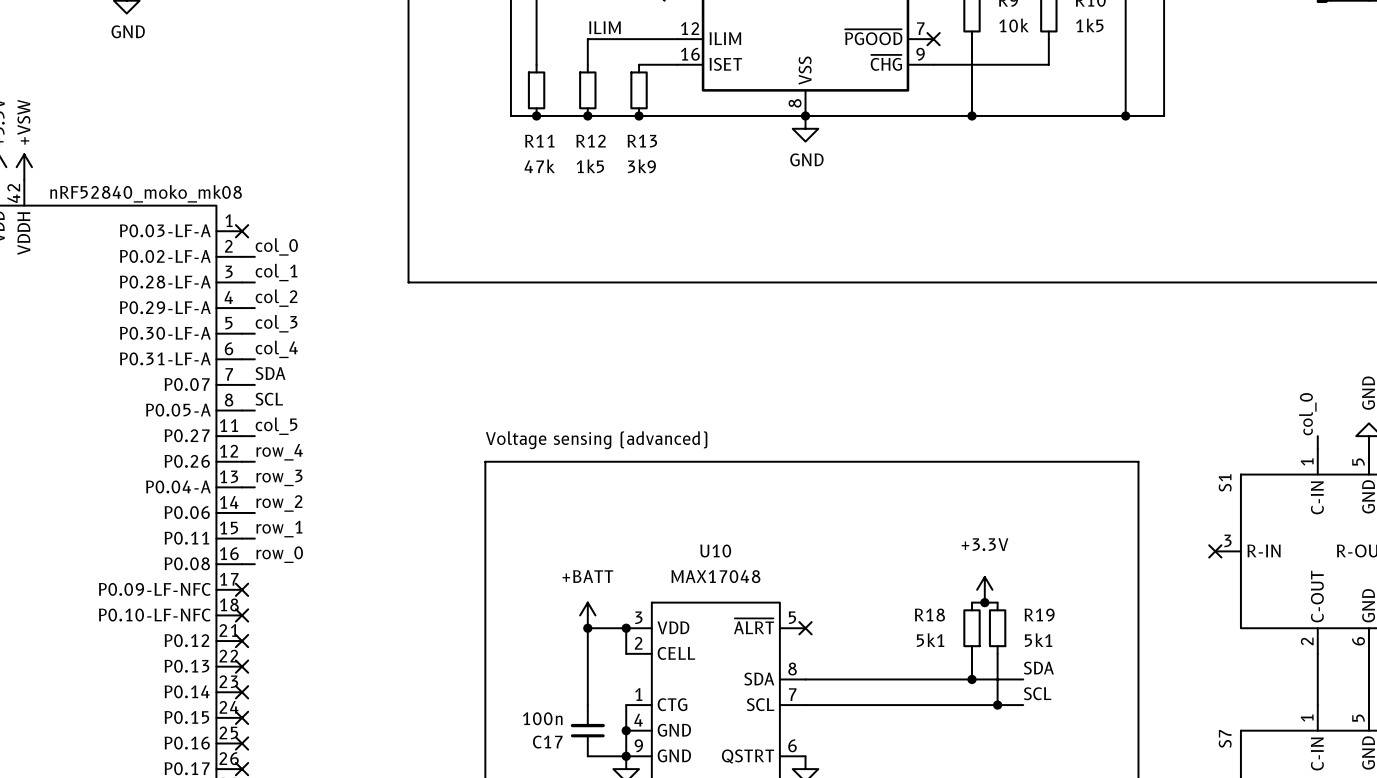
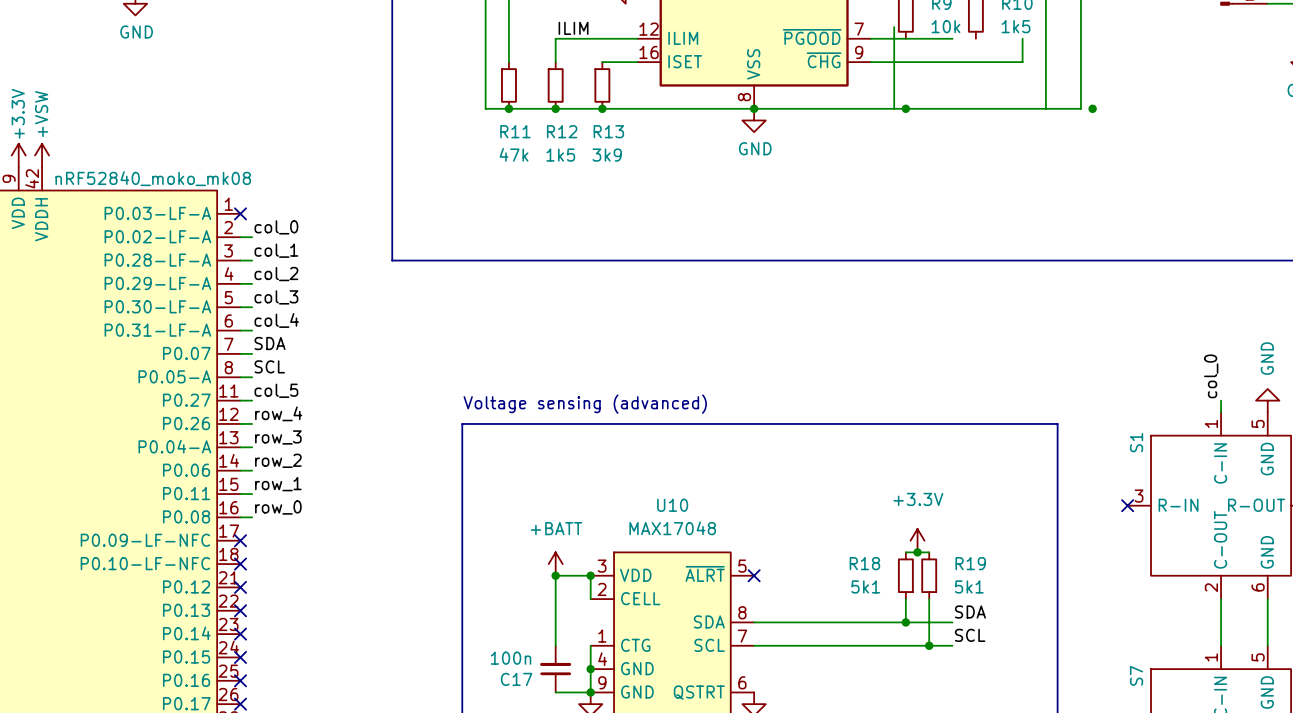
wire: none -> (894, 27) (894, 108)
wire: none -> (870, 38) (952, 38)
no-connect mark: (933, 39) -> none
wire: (972, 39) (972, 115) -> none
wire: (1048, 39) (1048, 64) -> (1022, 38) (1022, 62) (975, 62)
junction position: (1125, 115) -> (1092, 108)

